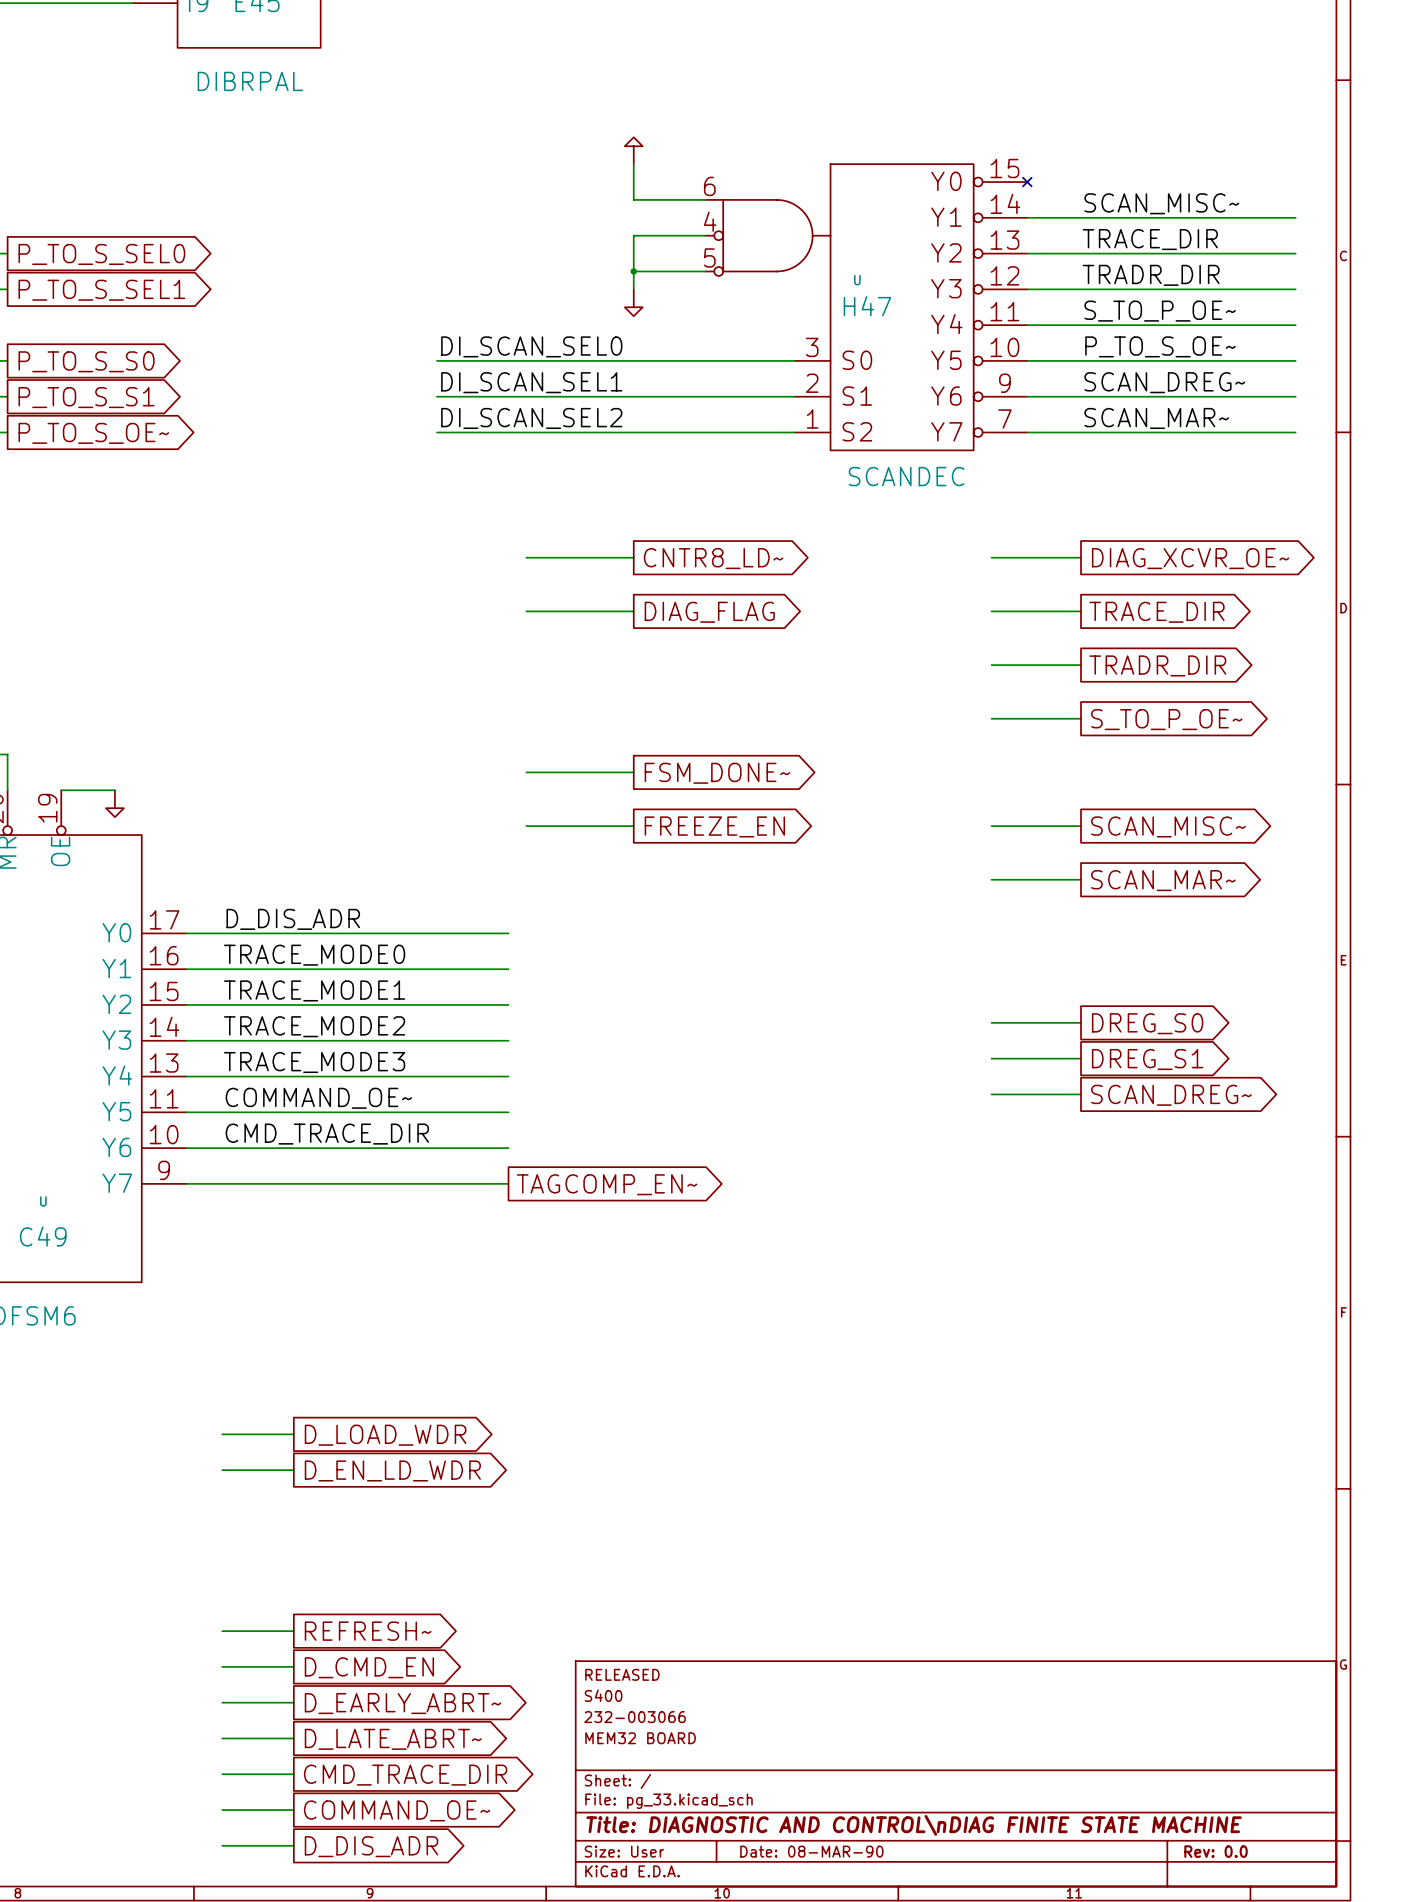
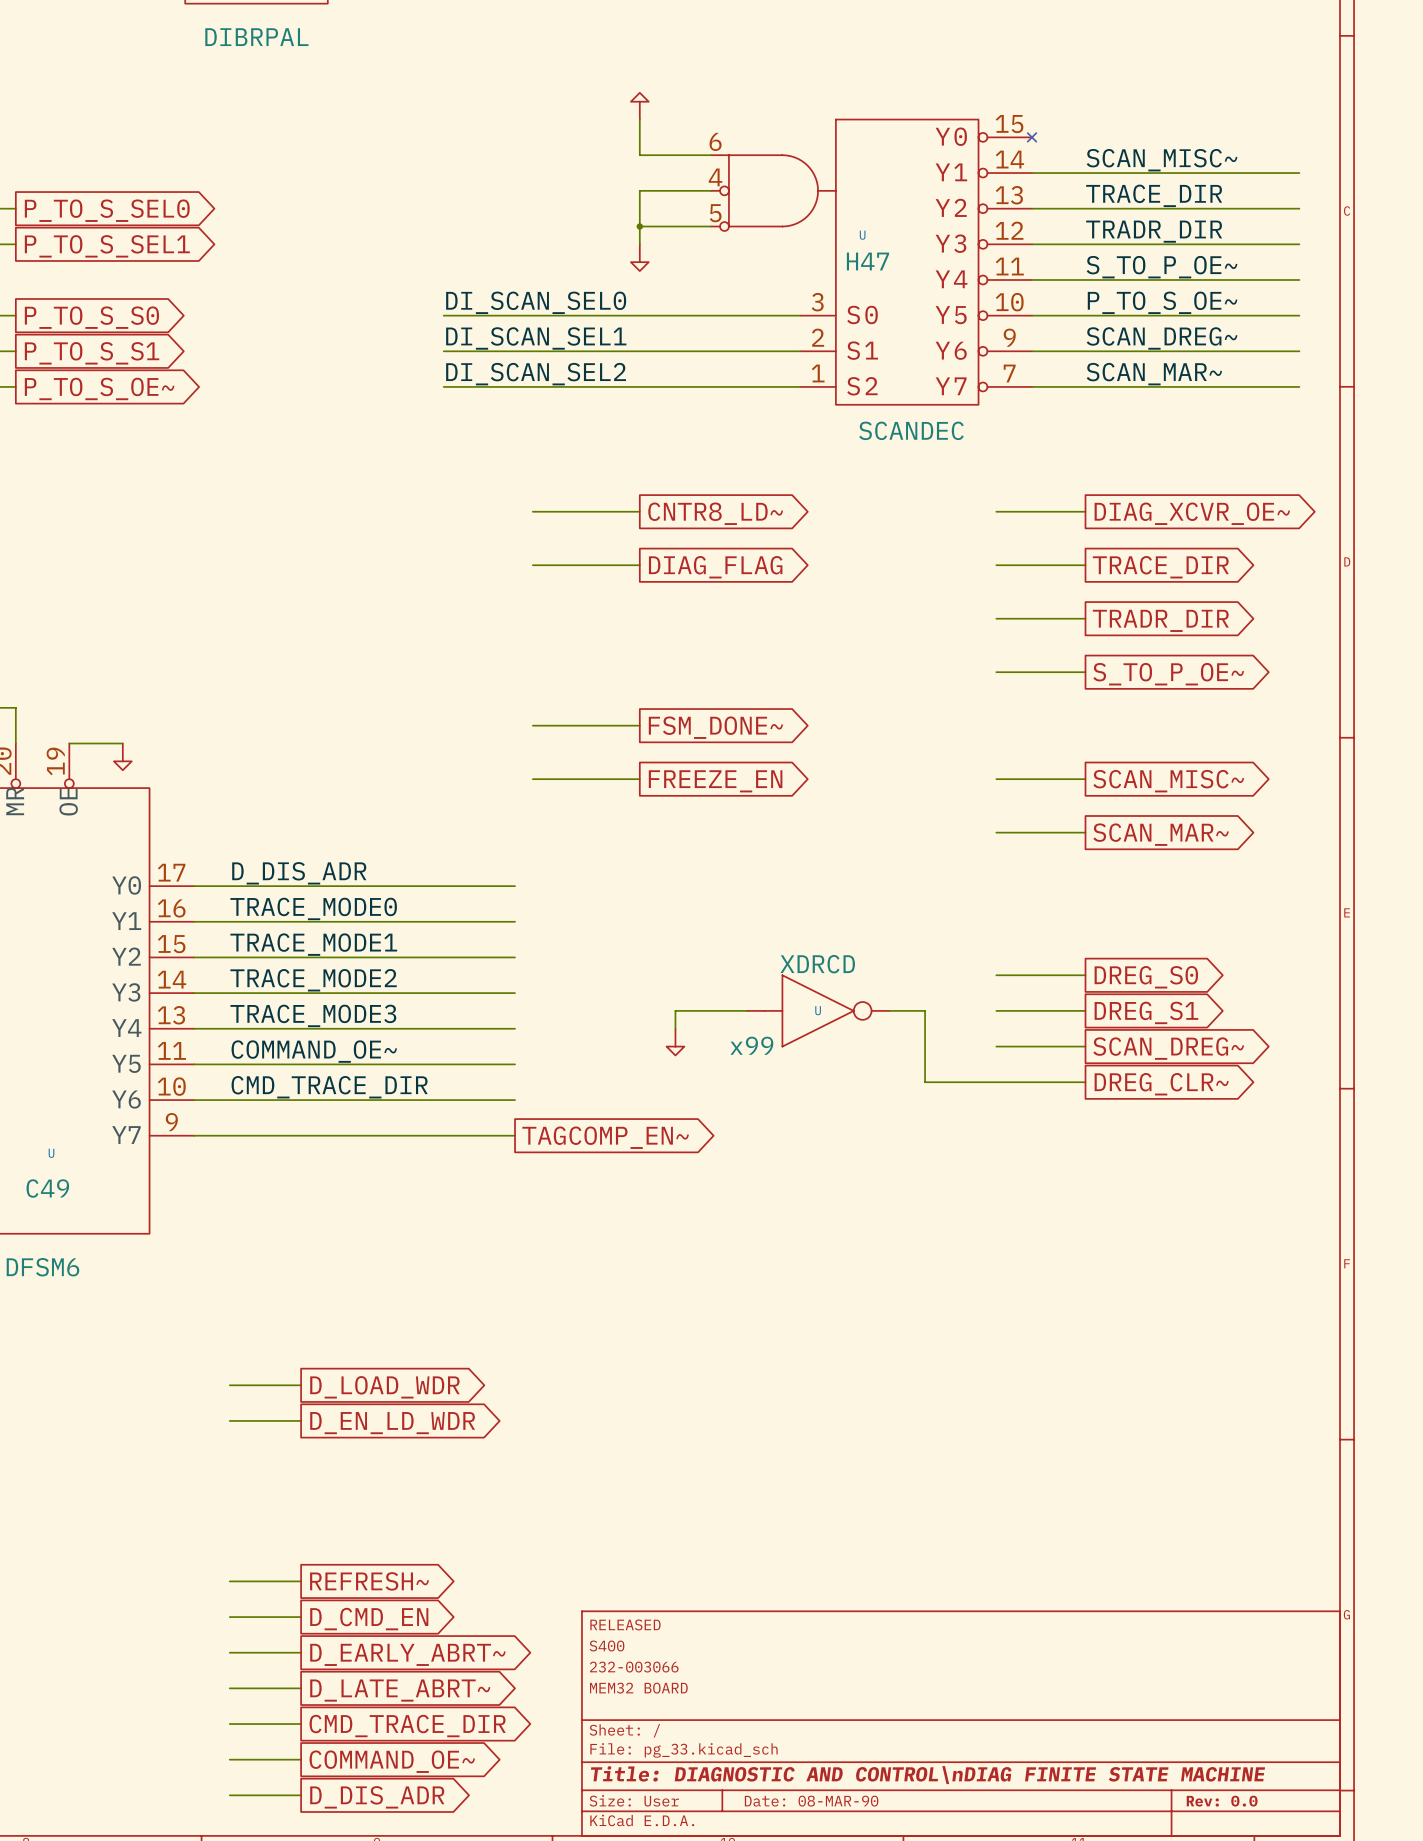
wire: none -> (746, 1010) (675, 1010) (675, 1028)
U: none -> (818, 1010)
wire: none -> (889, 1010) (925, 1010) (925, 1082) (1085, 1082)
power symbol: none -> (675, 1042)
global label: none -> DREG_CLR~ (1161, 1084)

